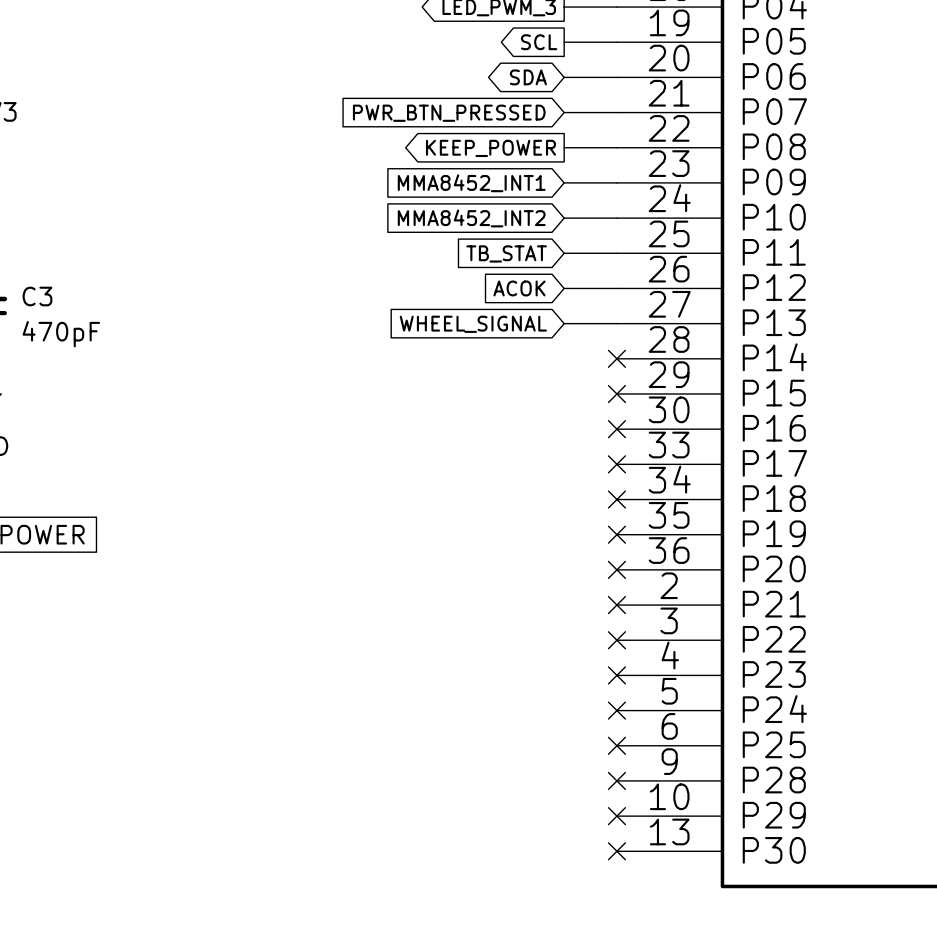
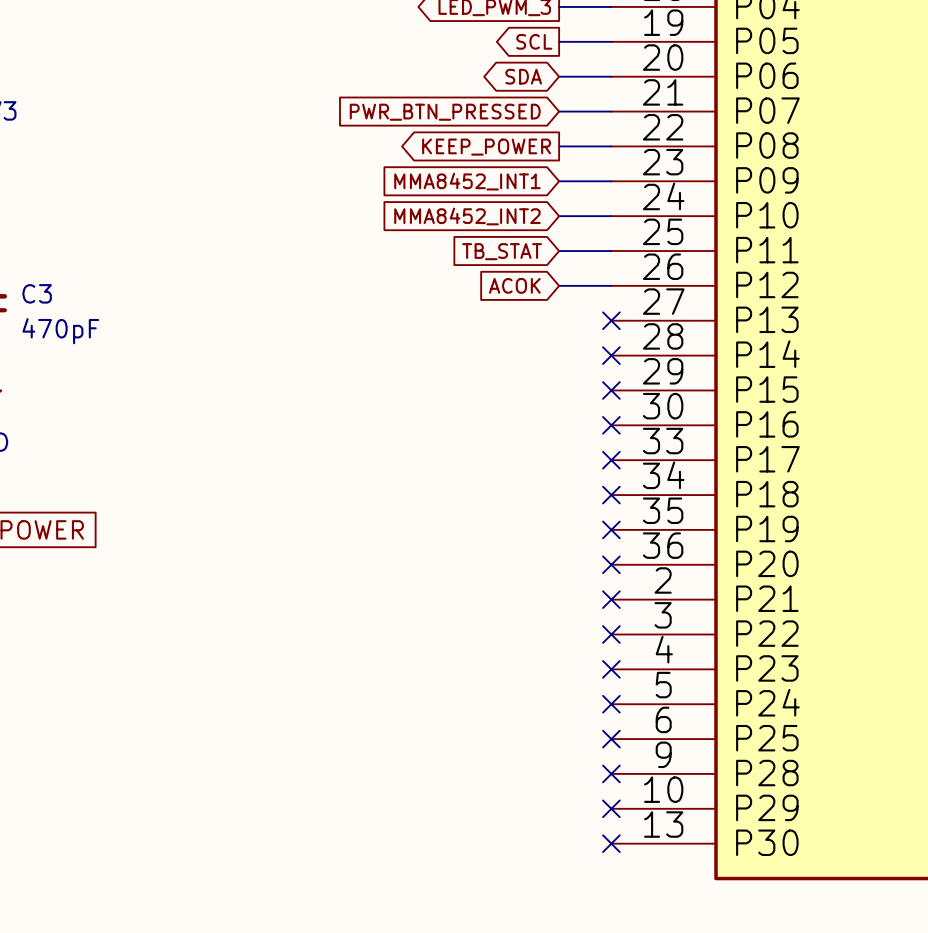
wire: (564, 323) (616, 323) -> none
no-connect mark: none -> (611, 320)
global label: WHEEL_SIGNAL (473, 324) -> none

